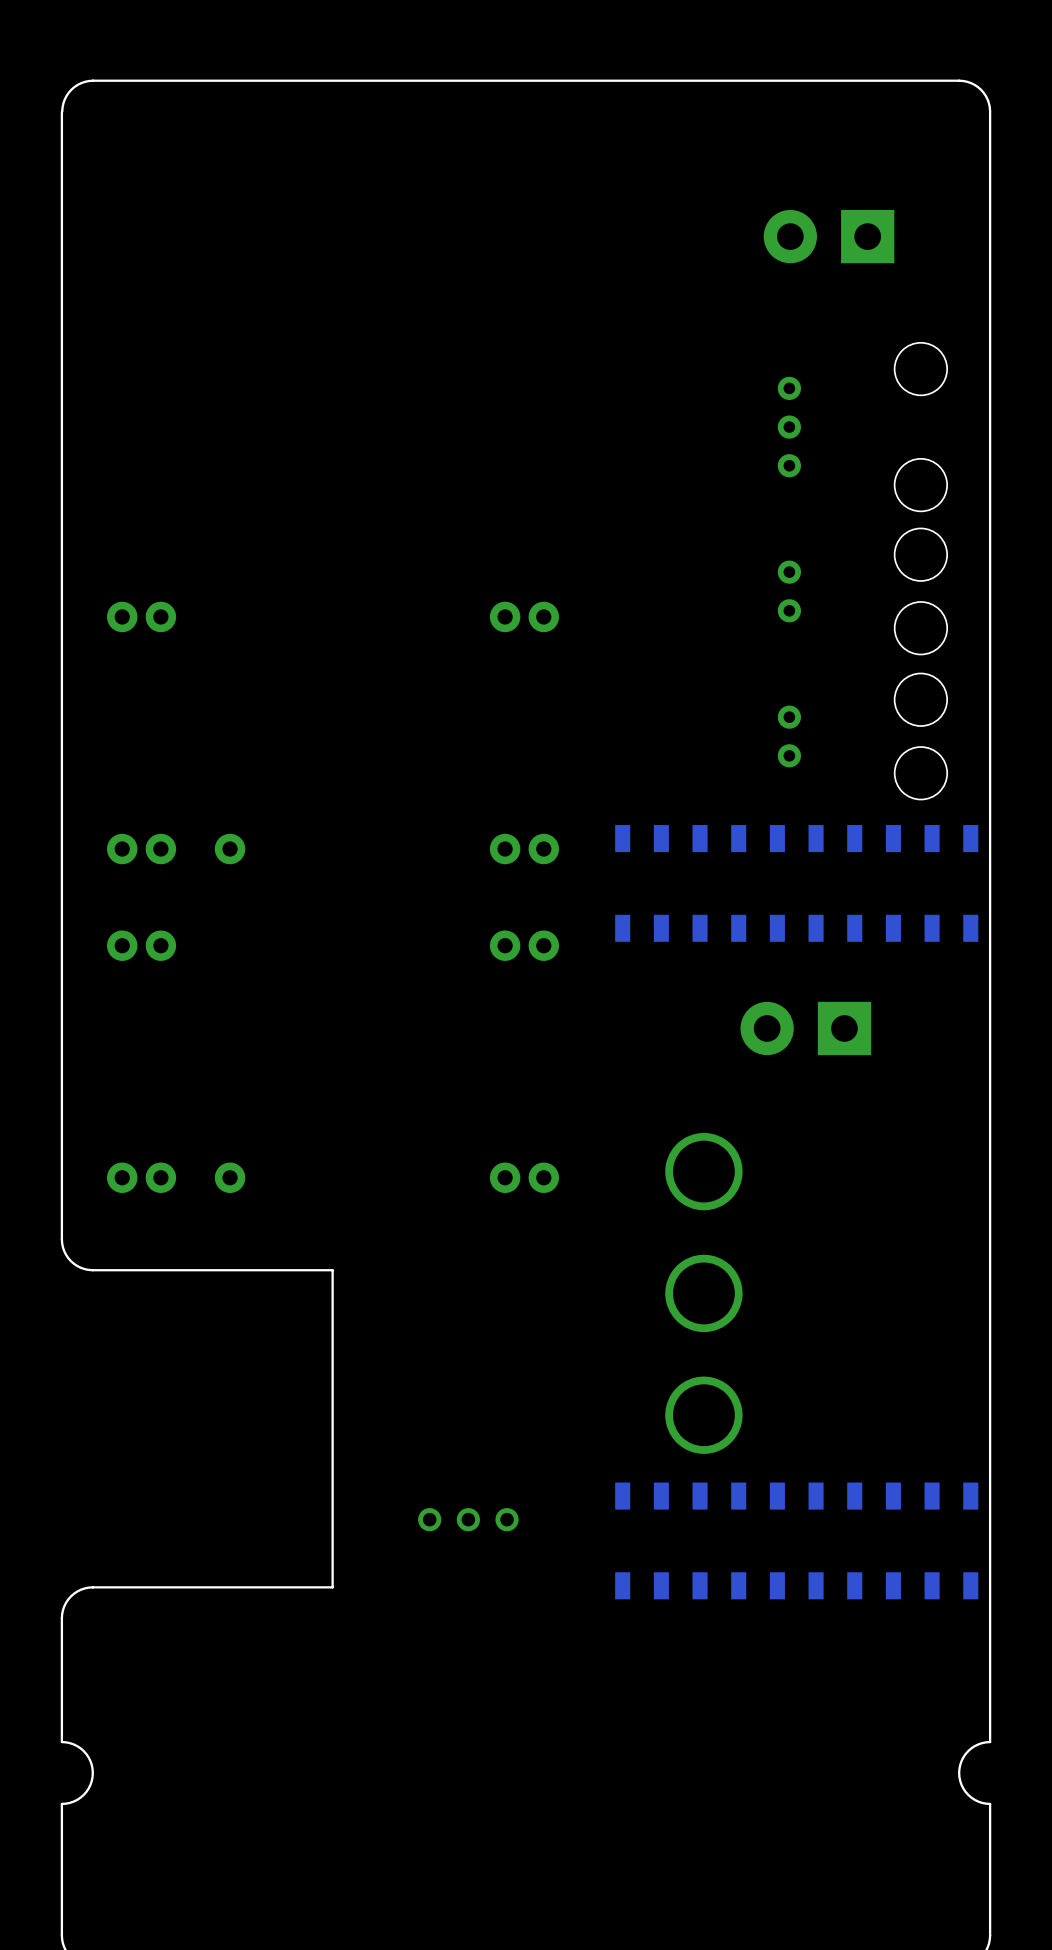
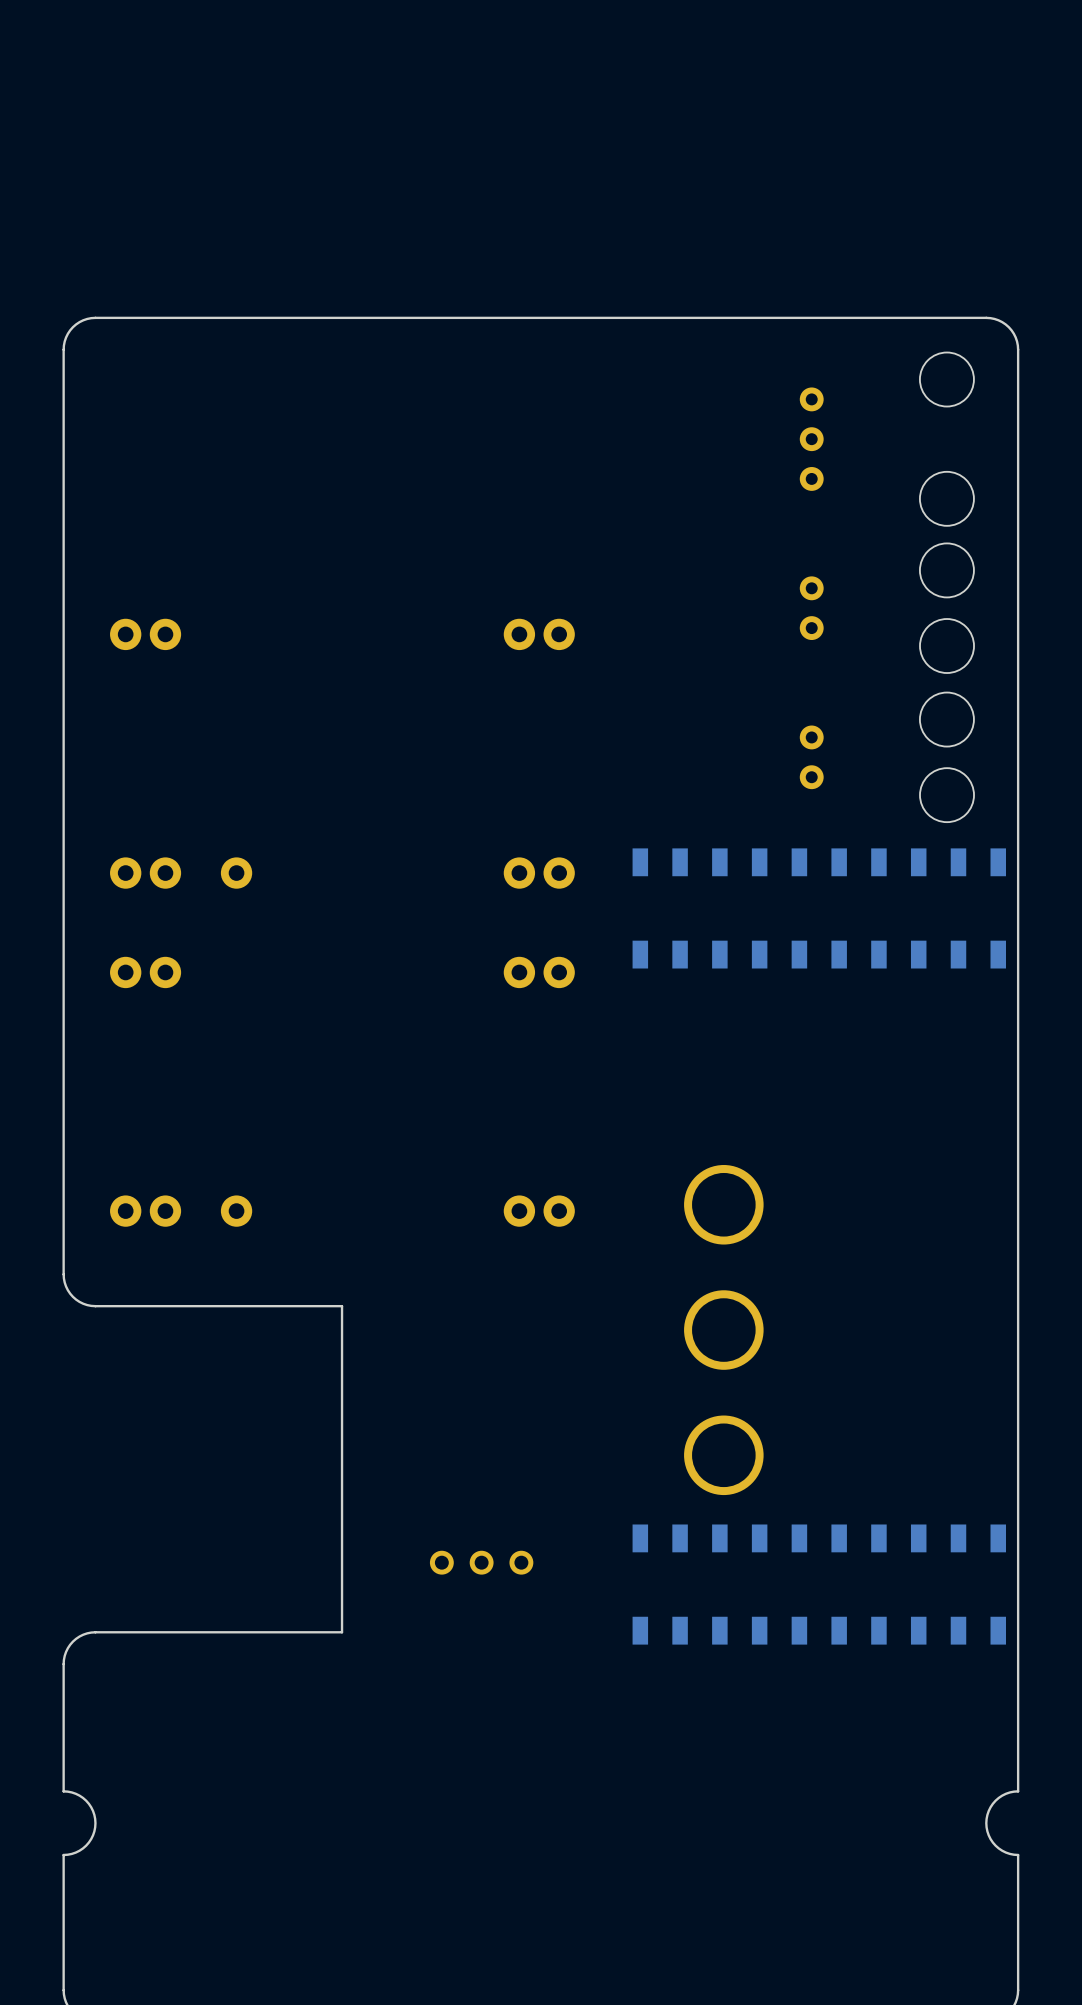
board edge: (92, 80) (959, 80) (971, 83) (981, 89) (987, 99) (990, 111) -> none
board edge: (93, 80) (81, 83) (71, 89) (64, 99) (62, 111) -> none
board edge: (61, 111) (61, 340) -> none
board edge: (990, 111) (990, 340) -> (63, 349) (66, 337) (72, 327) (83, 320) (95, 317) (986, 317) (998, 320) (1008, 327) (1015, 337) (1018, 349)
part: (829, 236) -> none
part: (805, 1028) -> none

